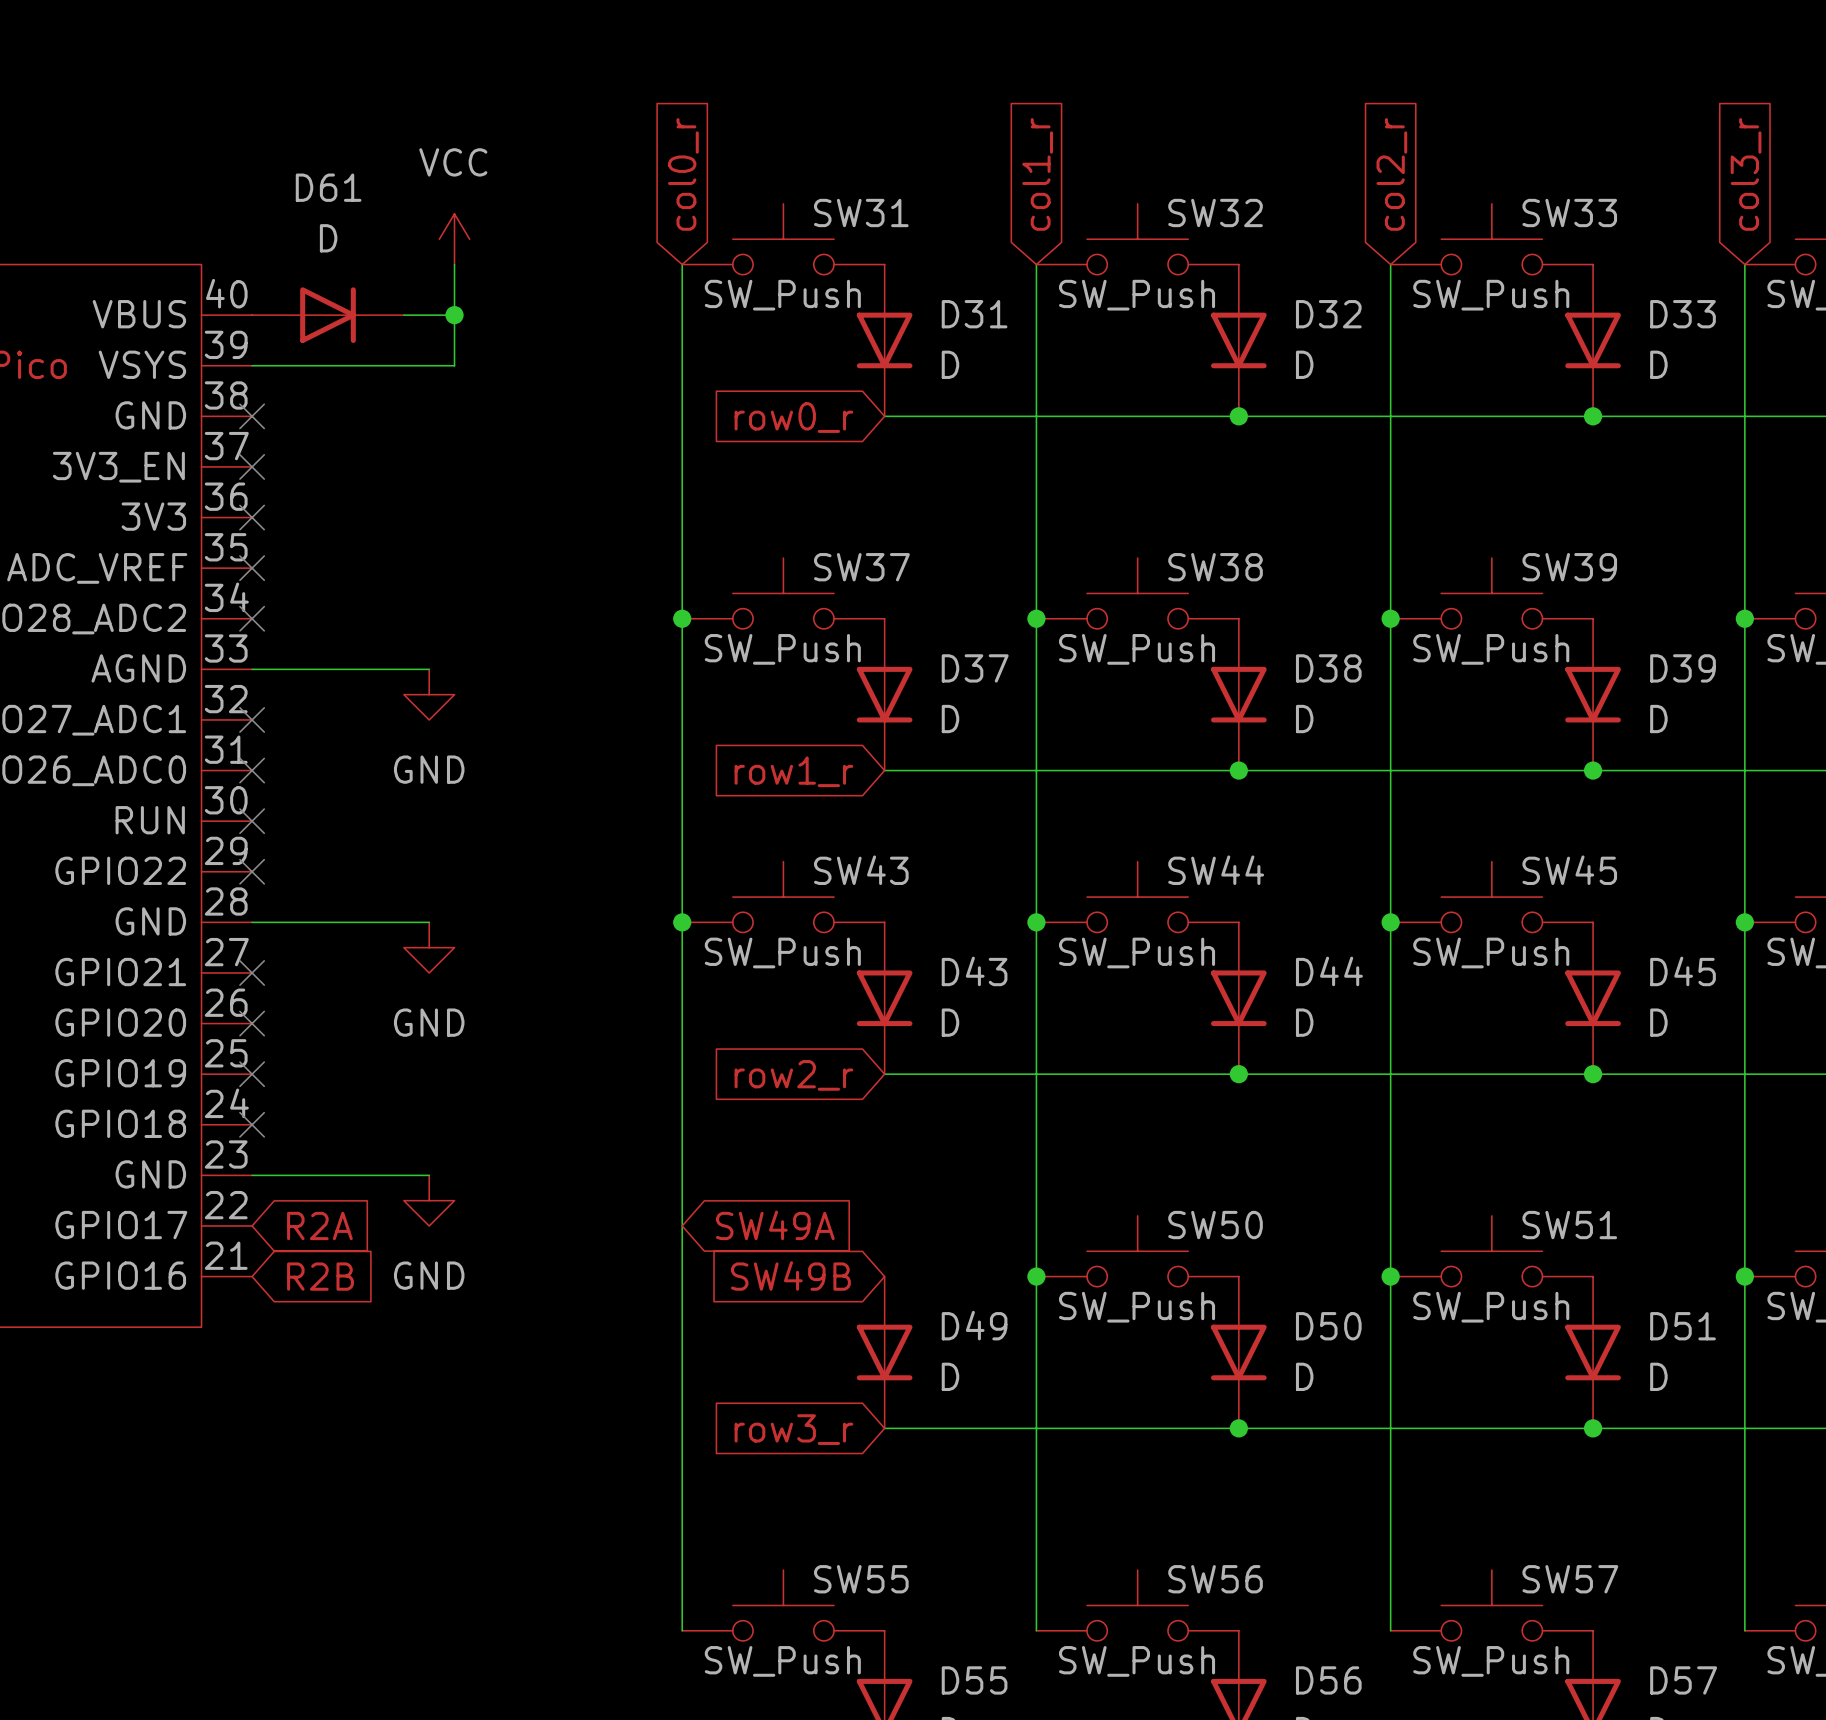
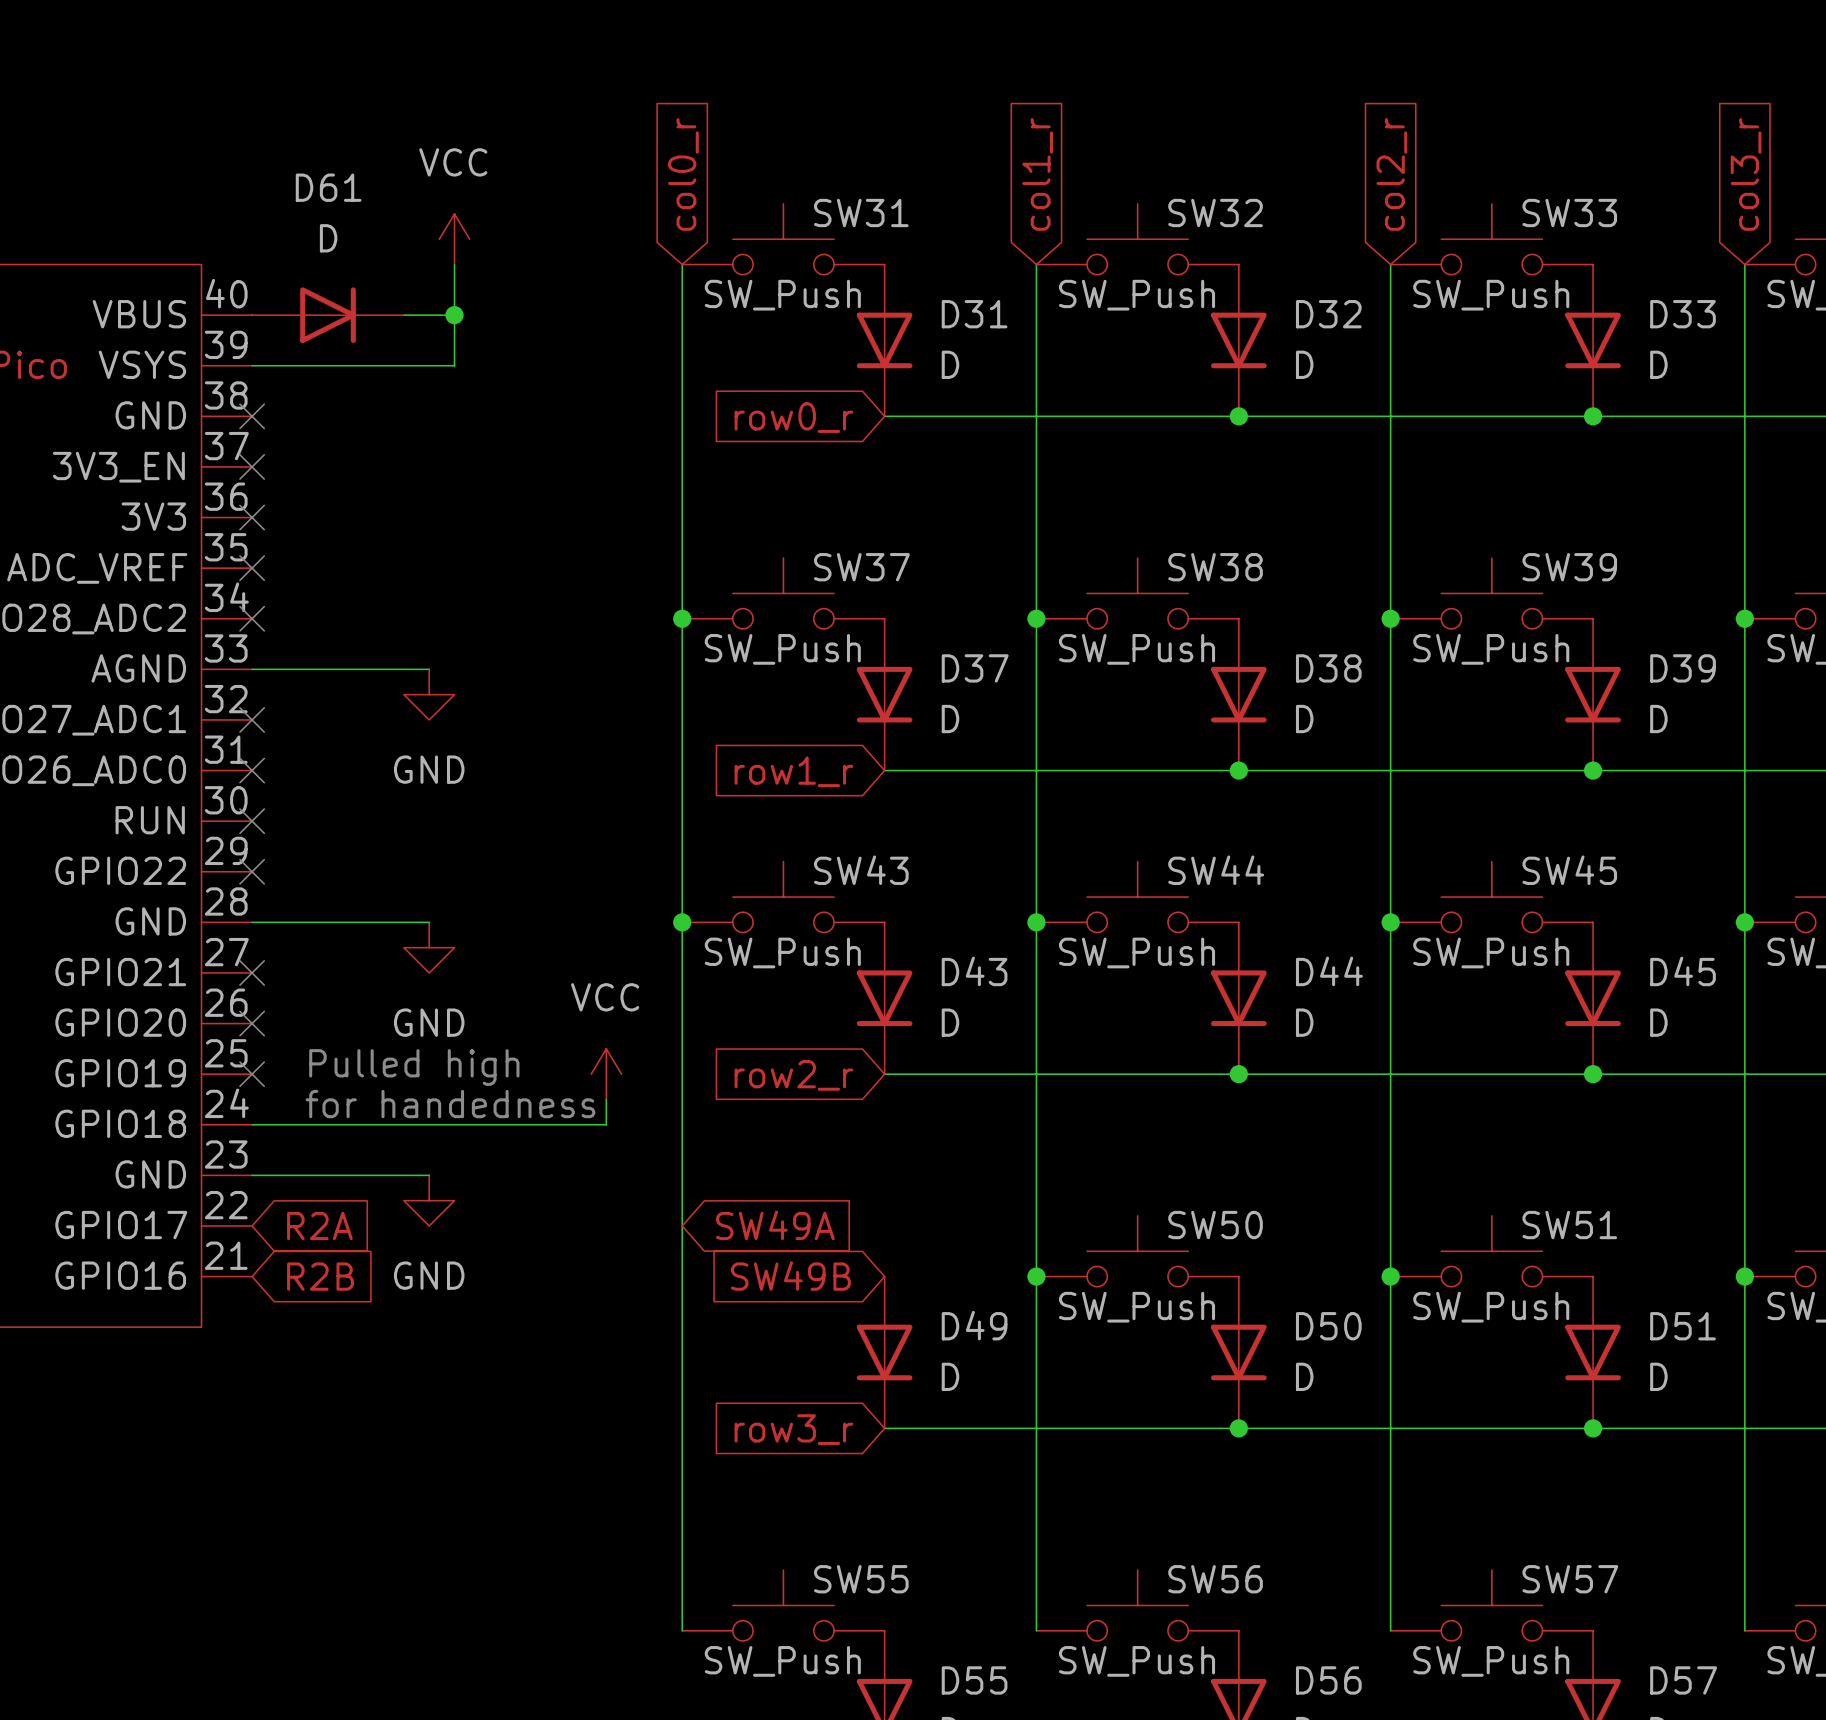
text: none -> Pulled high (414, 1067)
power symbol: none -> VCC (606, 1074)
wire: none -> (606, 1099) (606, 1124) (252, 1124)
text: none -> for handedness (450, 1104)
no-connect mark: (252, 1124) -> none

